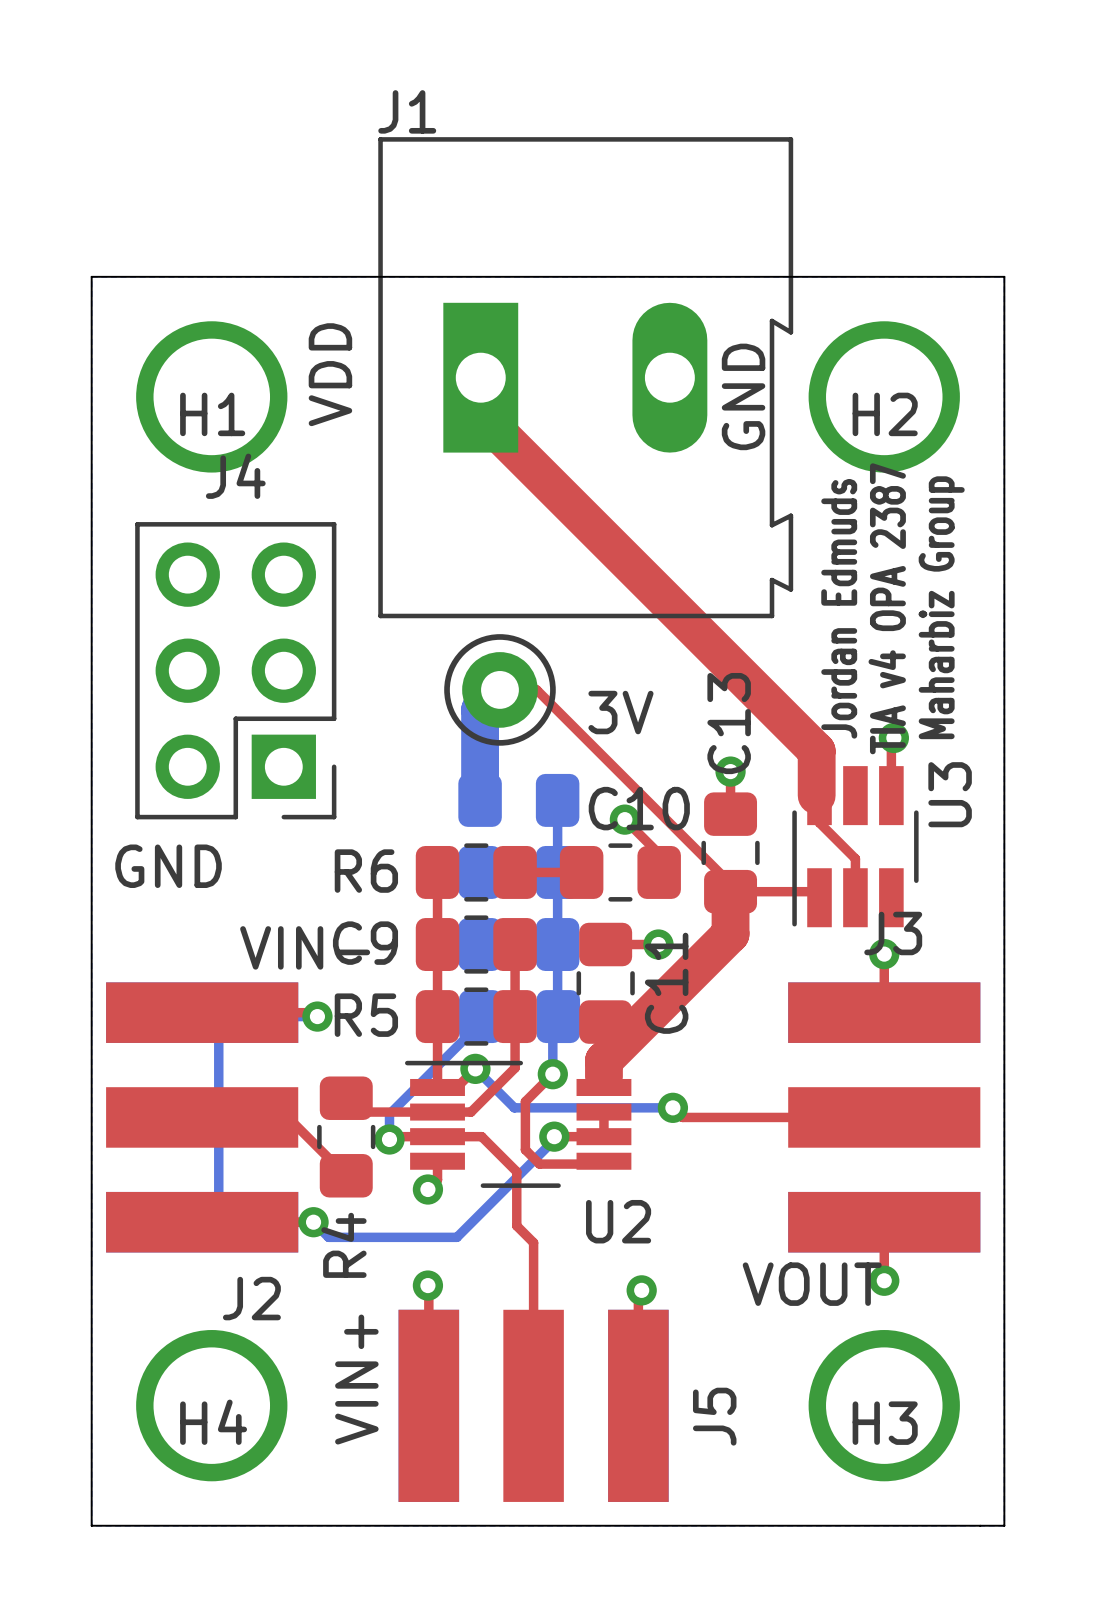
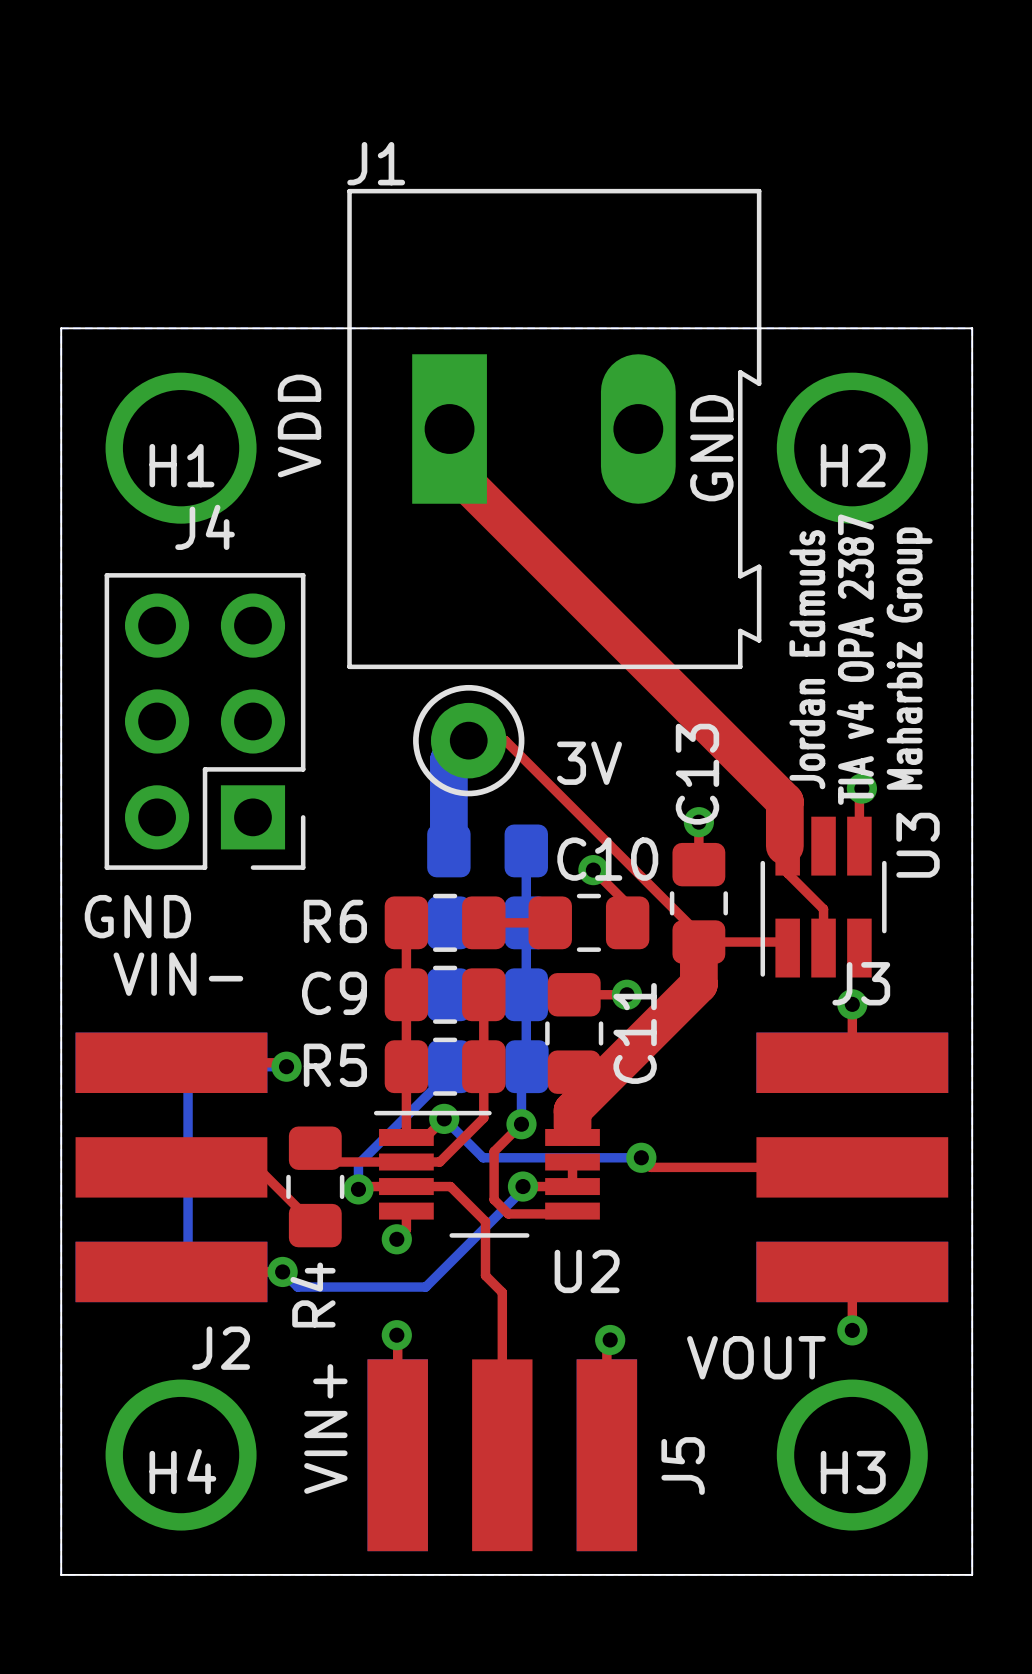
text position: VIN- (305, 947) -> VIN- (178, 974)
text position: VOUT (812, 1284) -> VOUT (756, 1357)

